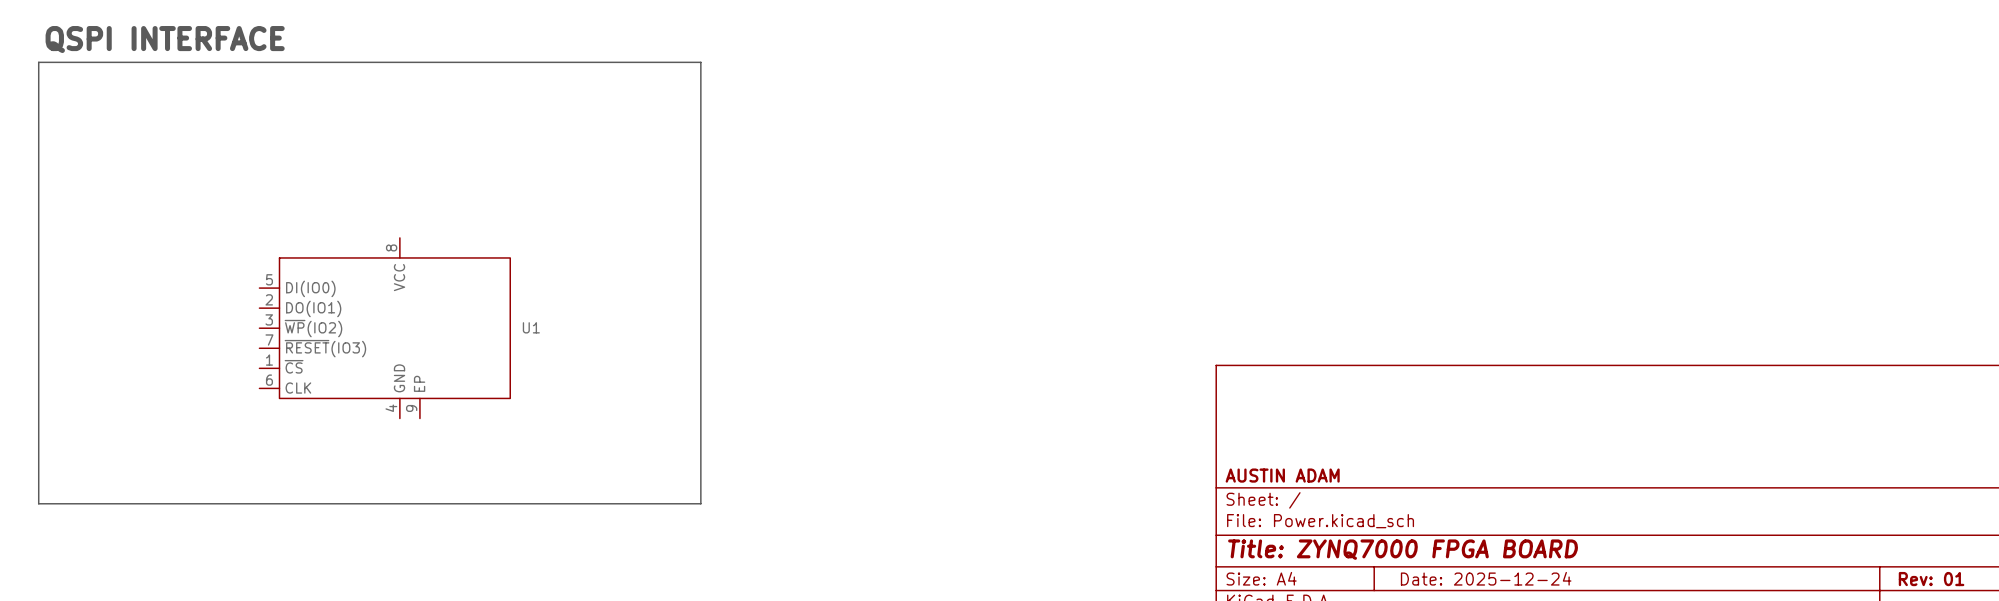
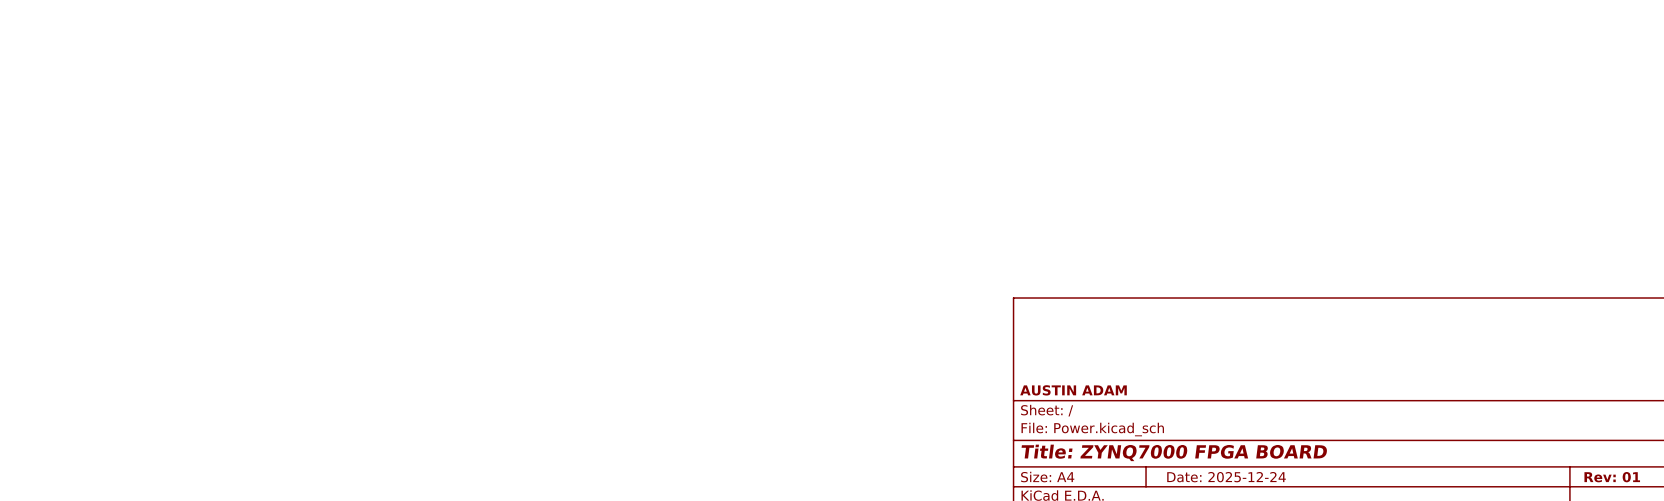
text: QSPI INTERFACE (165, 39) -> none
line: (38, 62) (700, 62) (700, 503) (38, 503) (38, 62) -> none
U1: (384, 328) -> none

